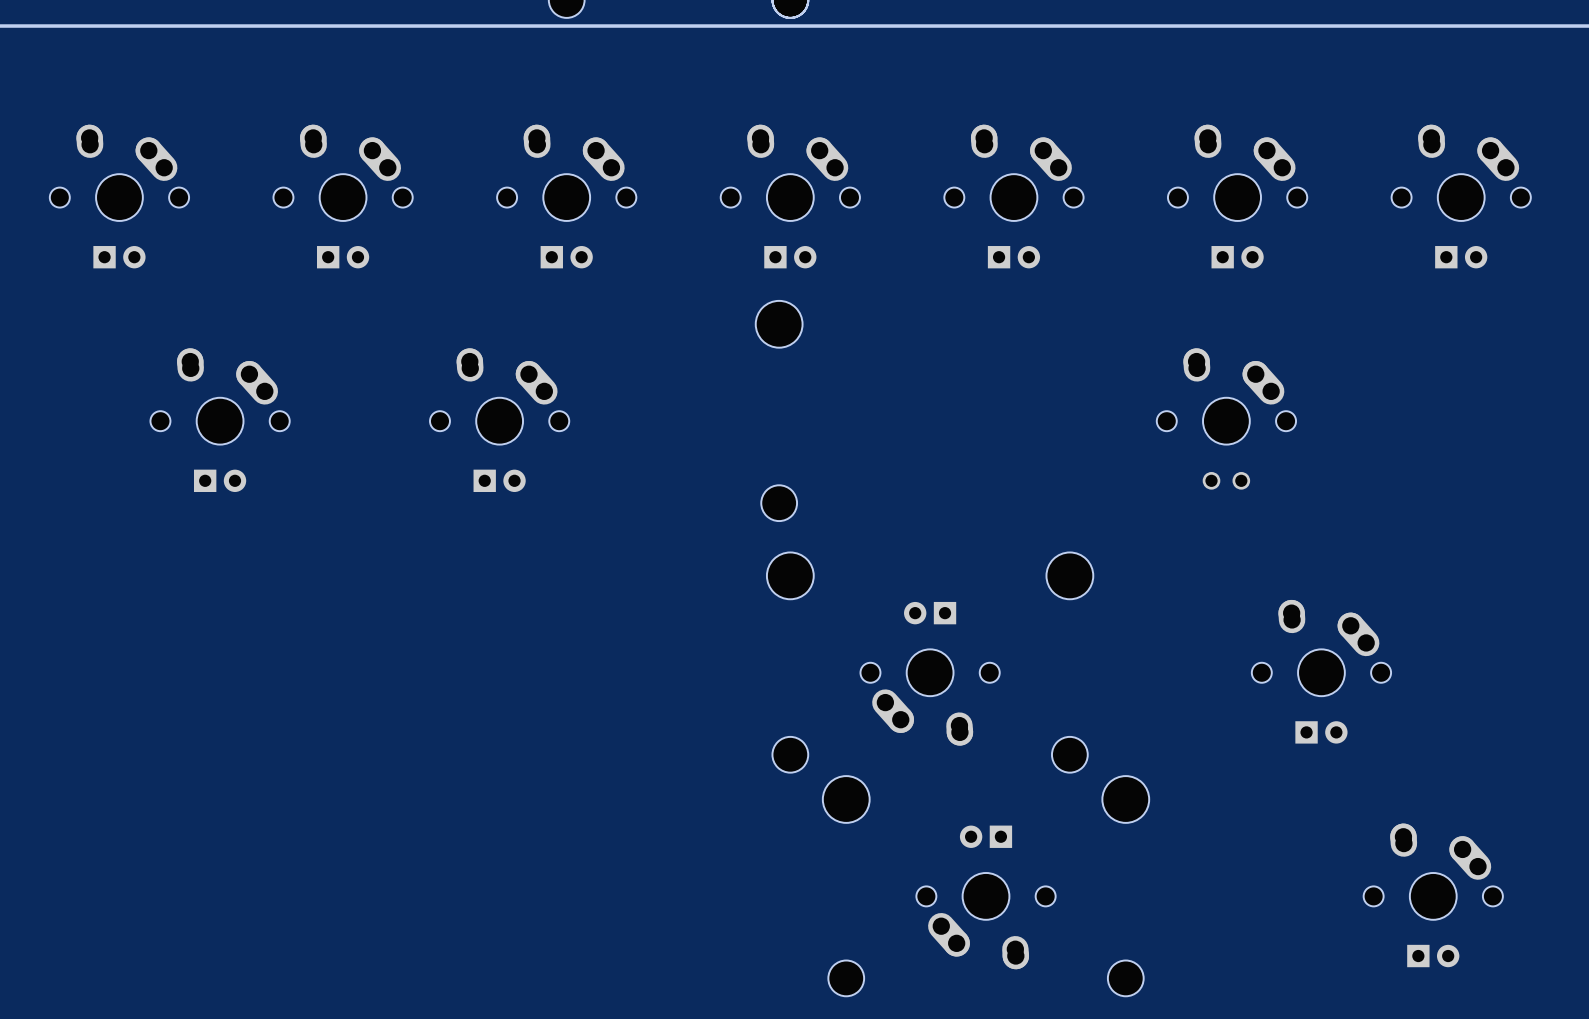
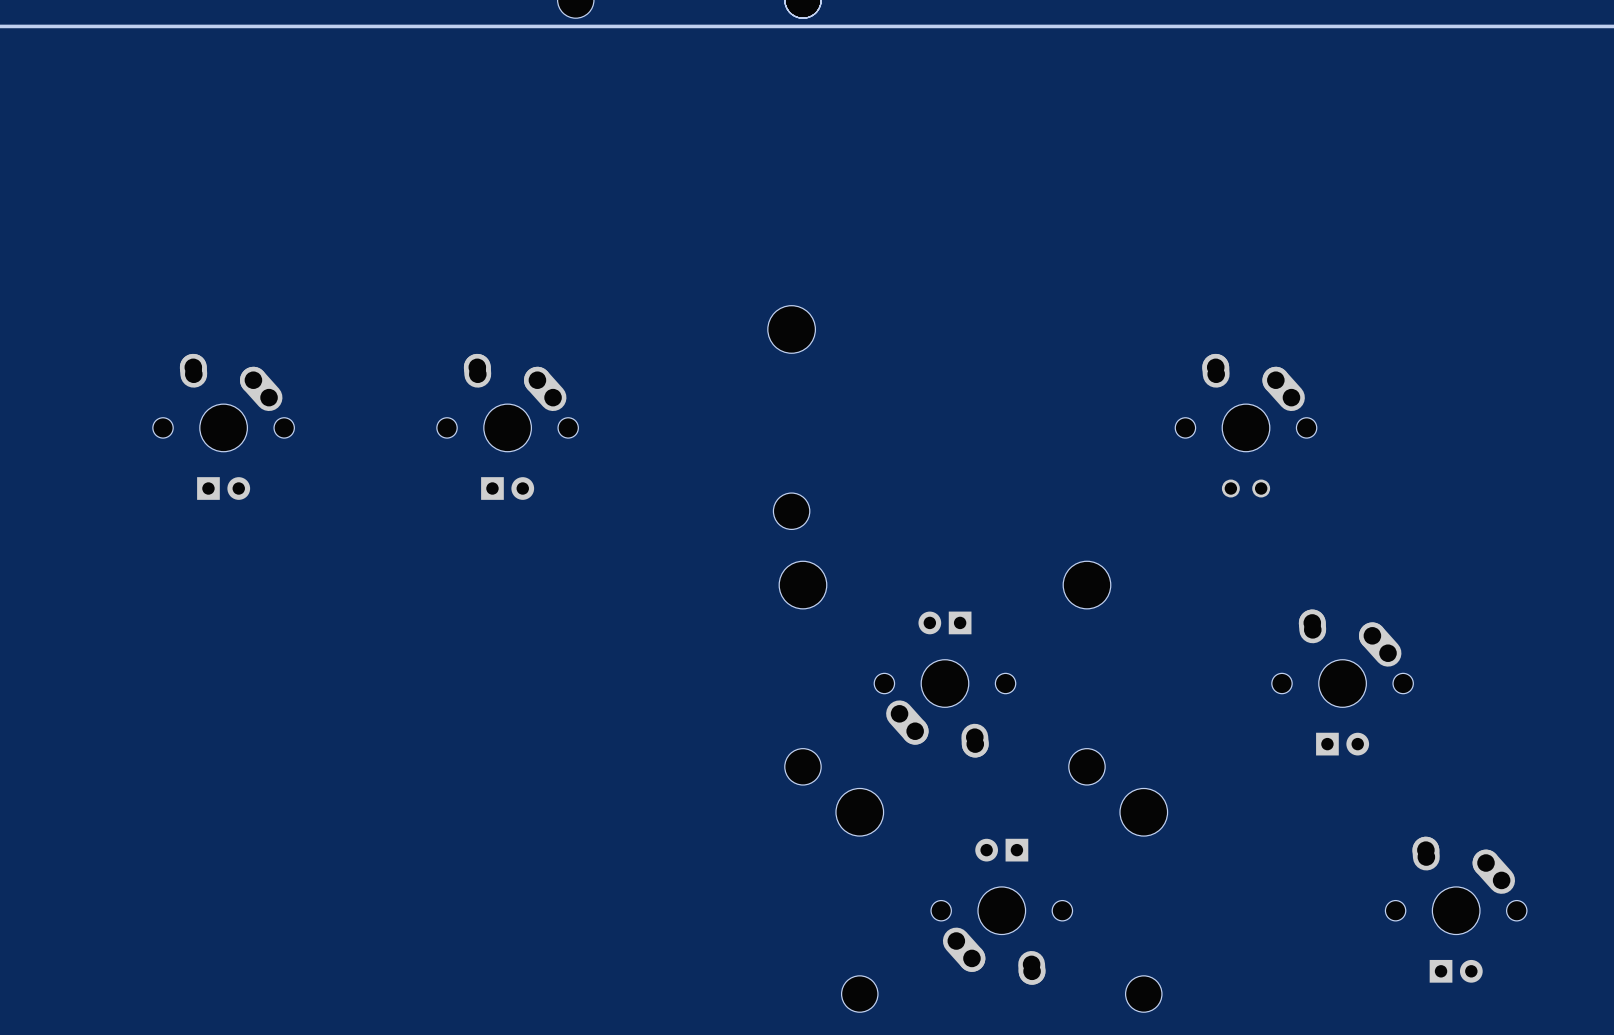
part: (119, 196) -> none
part: (343, 196) -> none
part: (566, 196) -> none
part: (790, 196) -> none
part: (1013, 196) -> none
part: (1237, 196) -> none
part: (1461, 196) -> none

